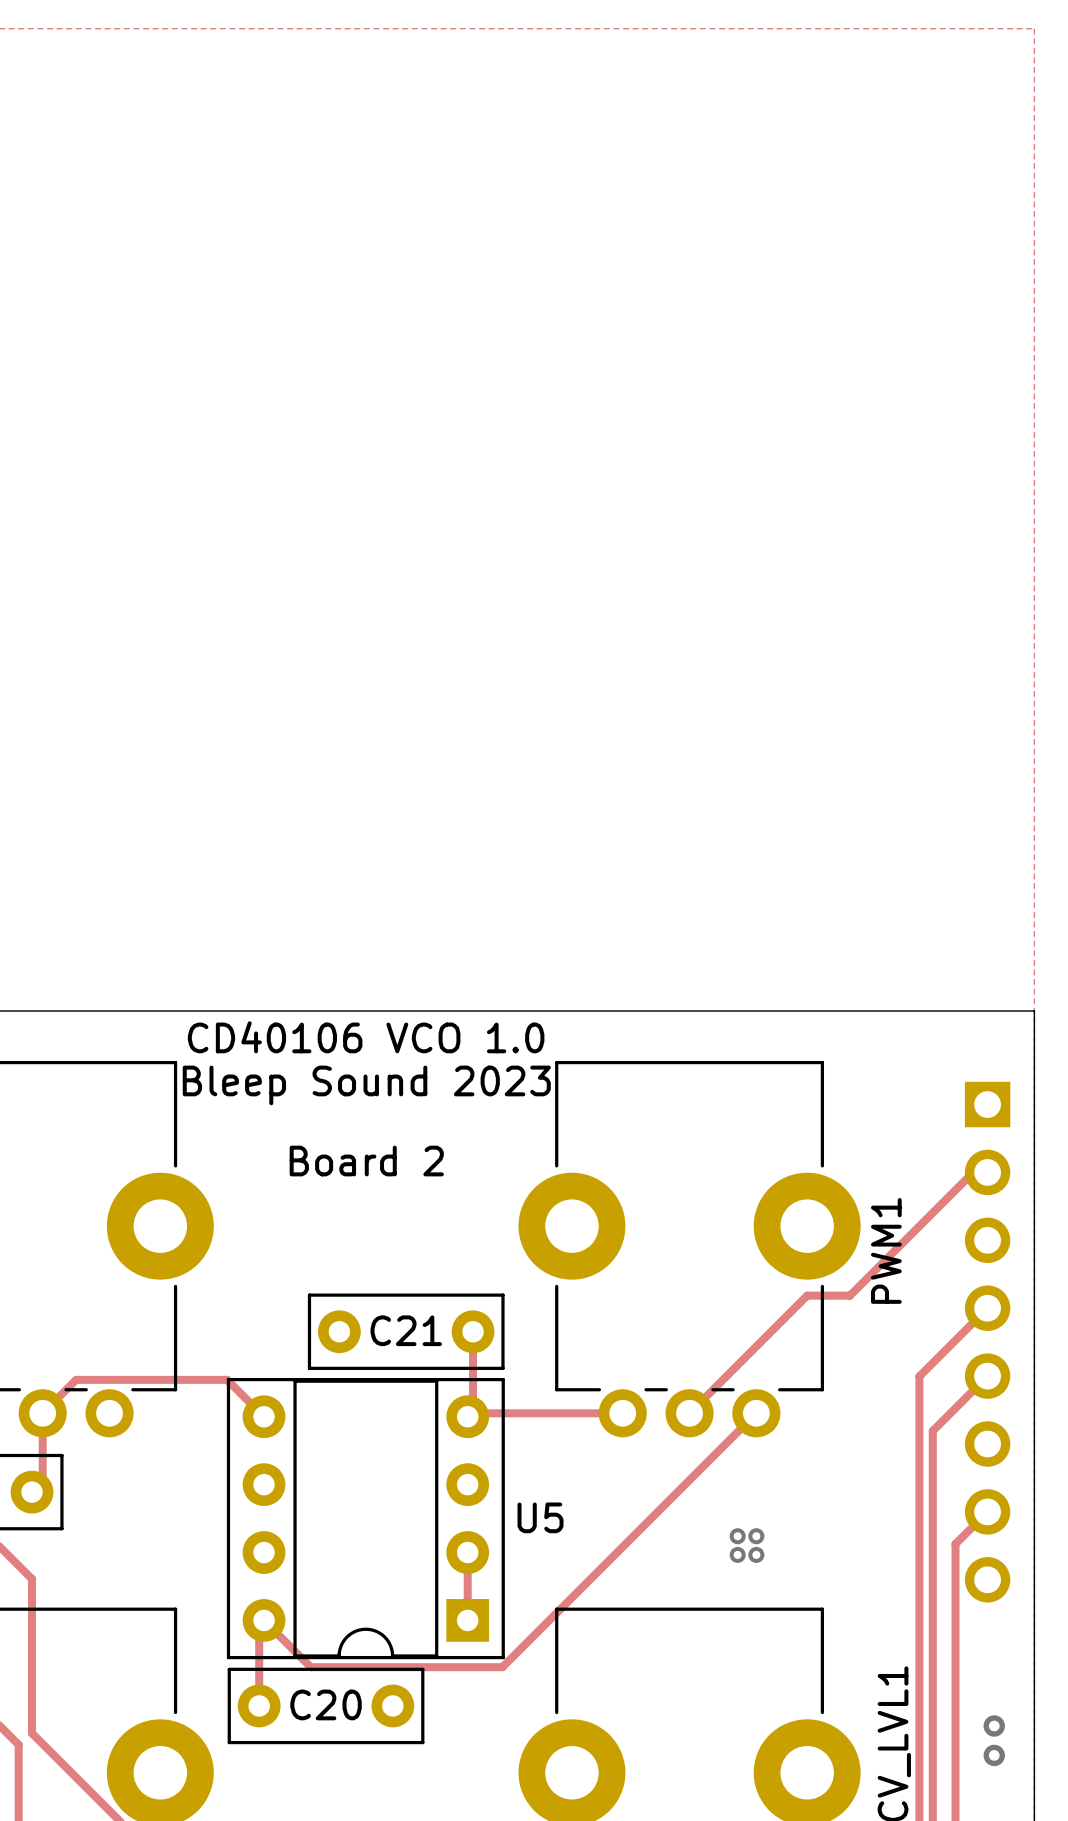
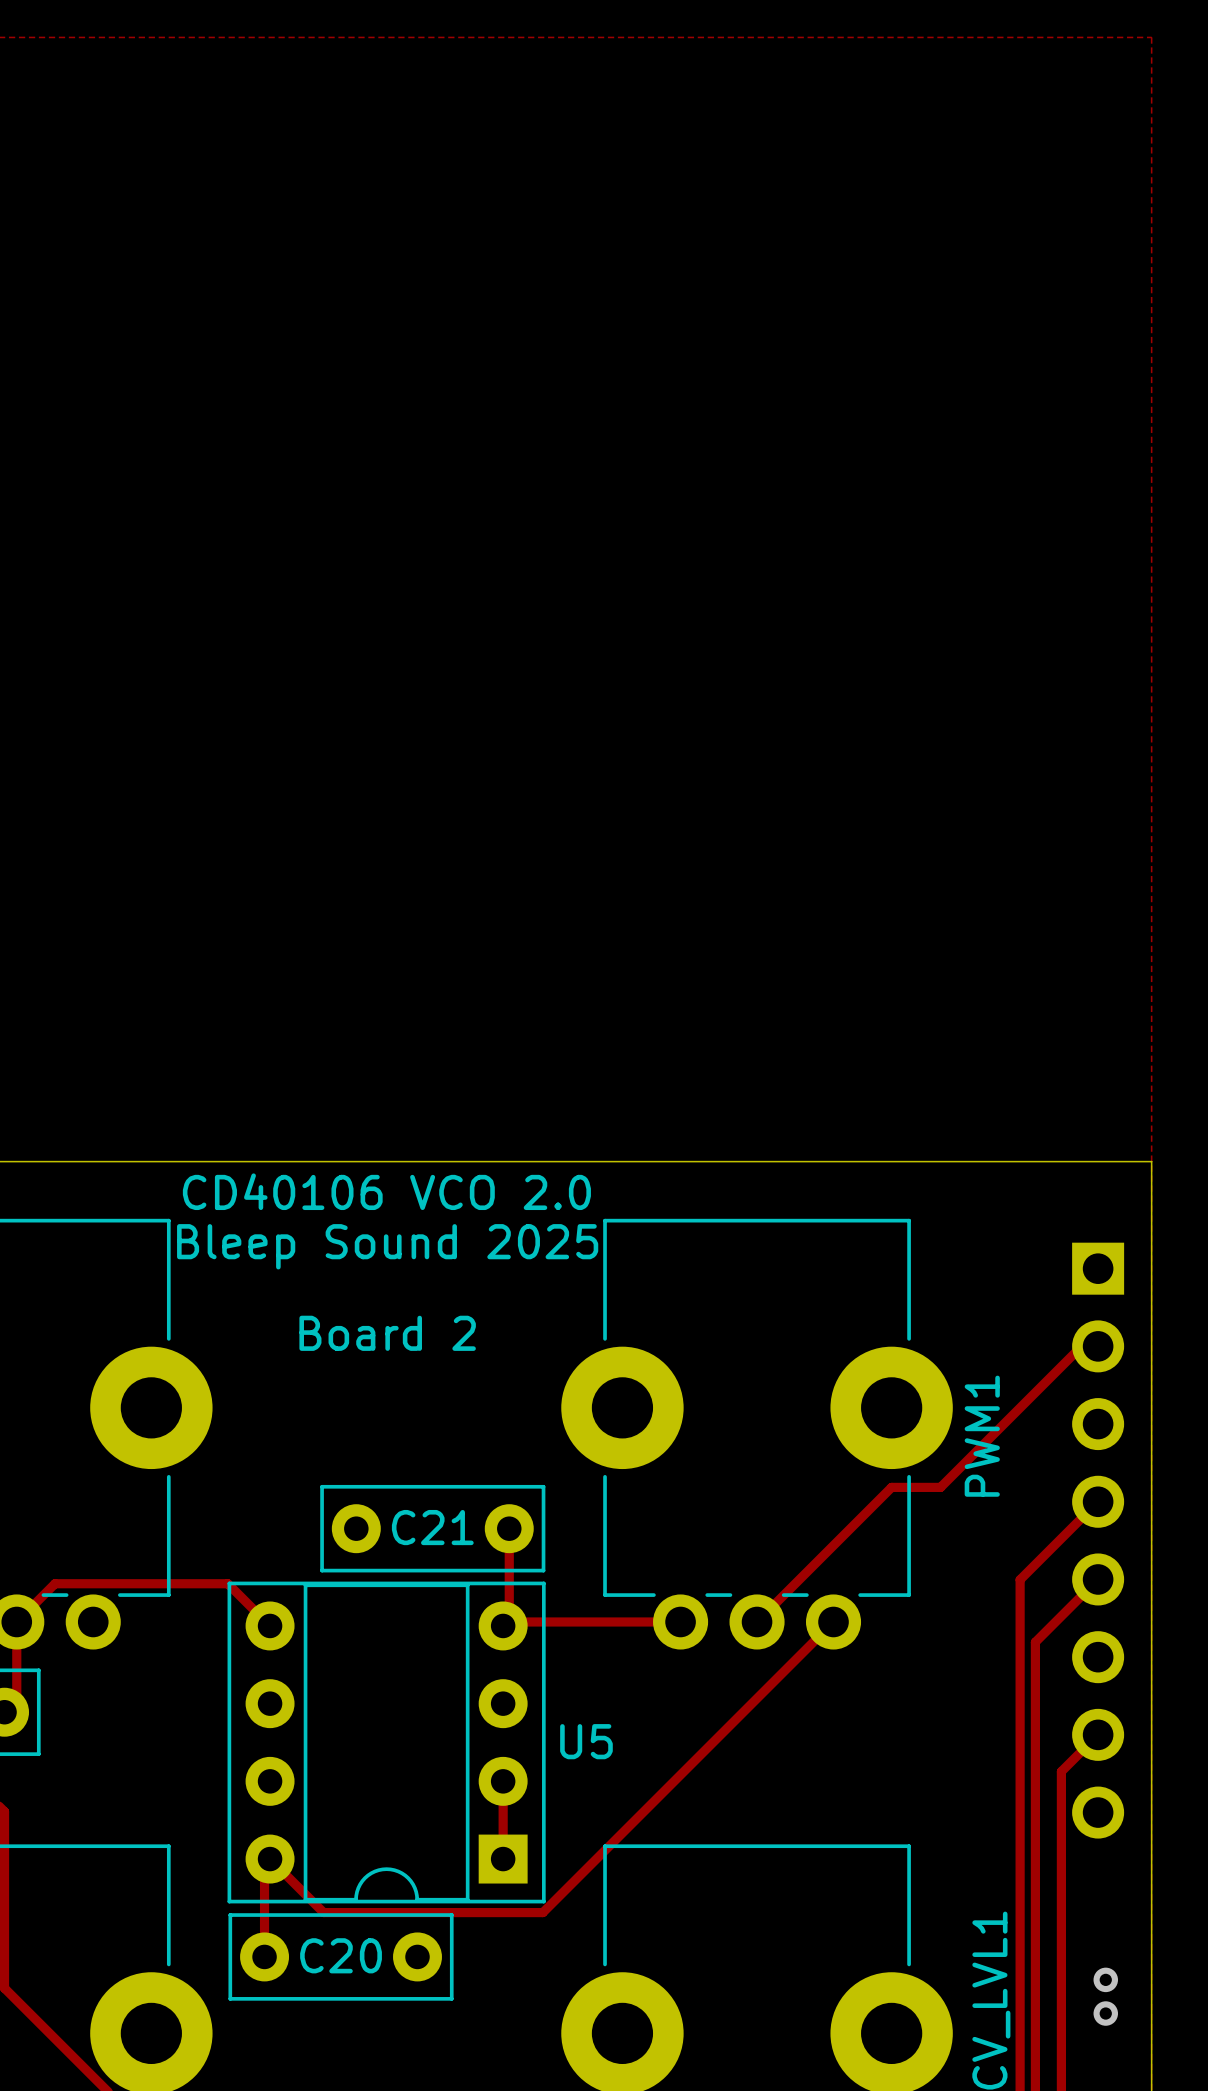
text: CD40106 VCO 1.0 (366, 1037) -> CD40106 VCO 2.0 (386, 1191)
text: Bleep Sound 2023 (366, 1085) -> Bleep Sound 2025 (387, 1246)
via: (737, 1536) -> none
via: (756, 1536) -> none
via: (737, 1554) -> none
via: (756, 1554) -> none

